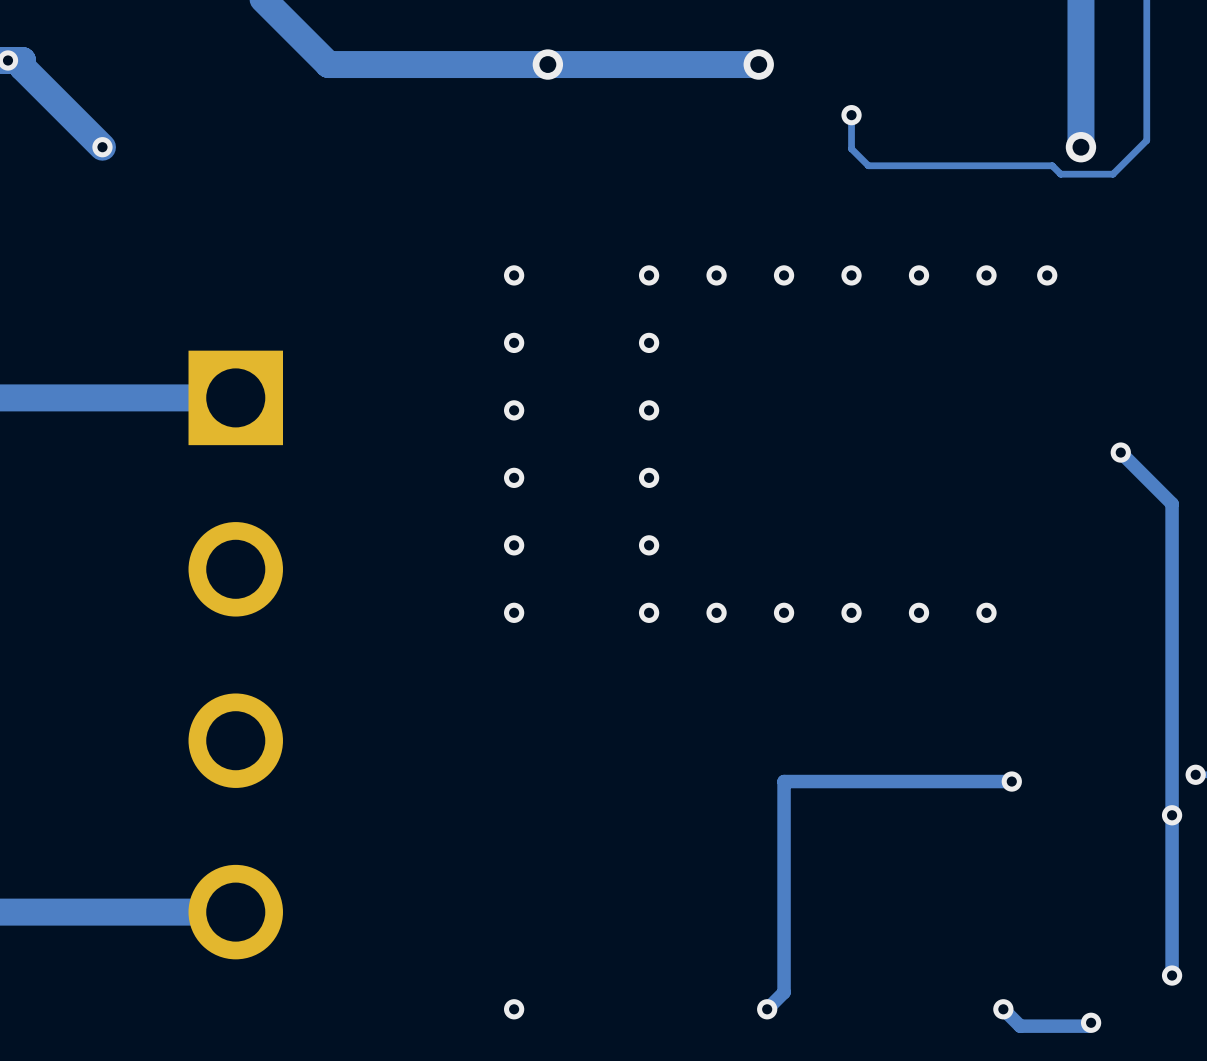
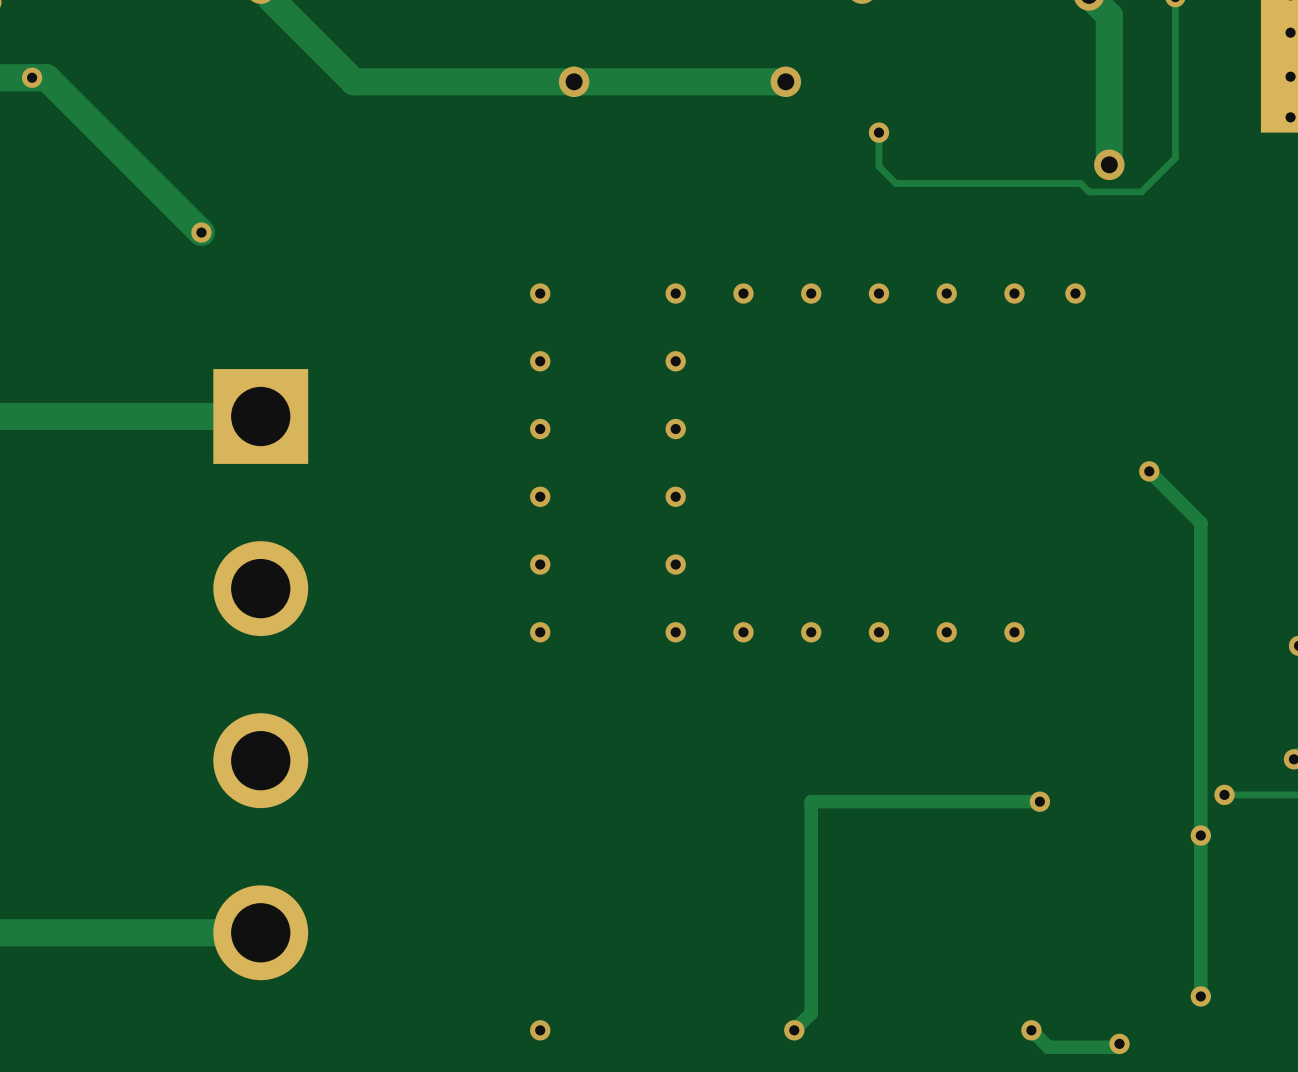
track: (22, 60) (22, 67) (102, 147) -> (46, 77) (201, 232)
via position: (102, 147) -> (201, 232)

